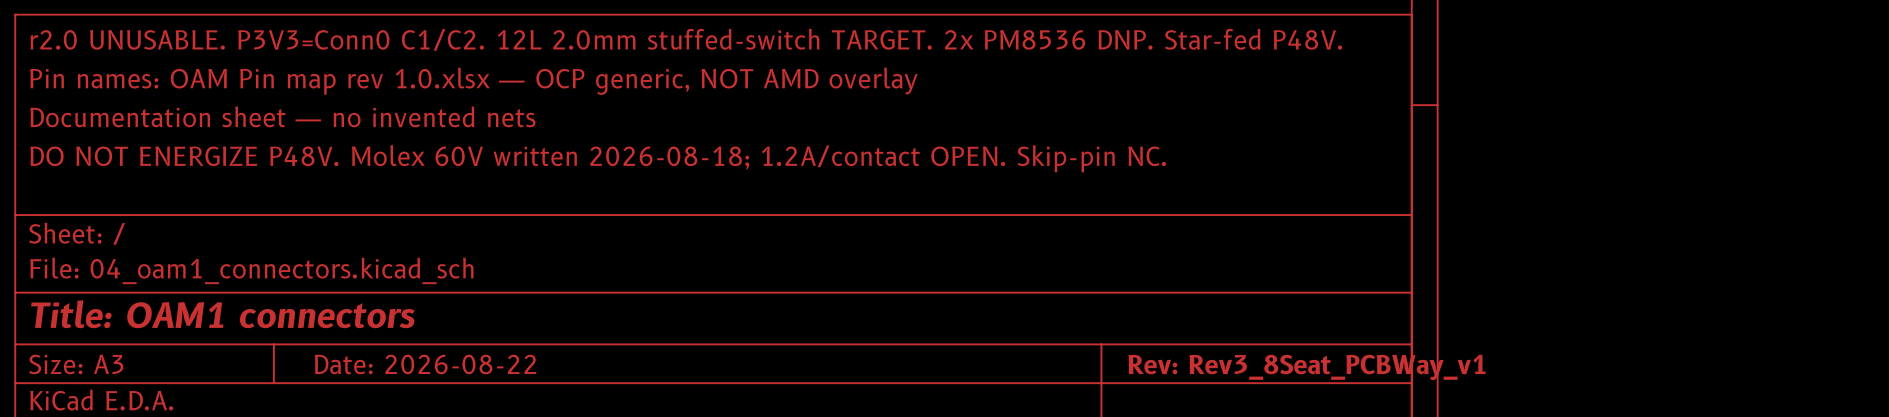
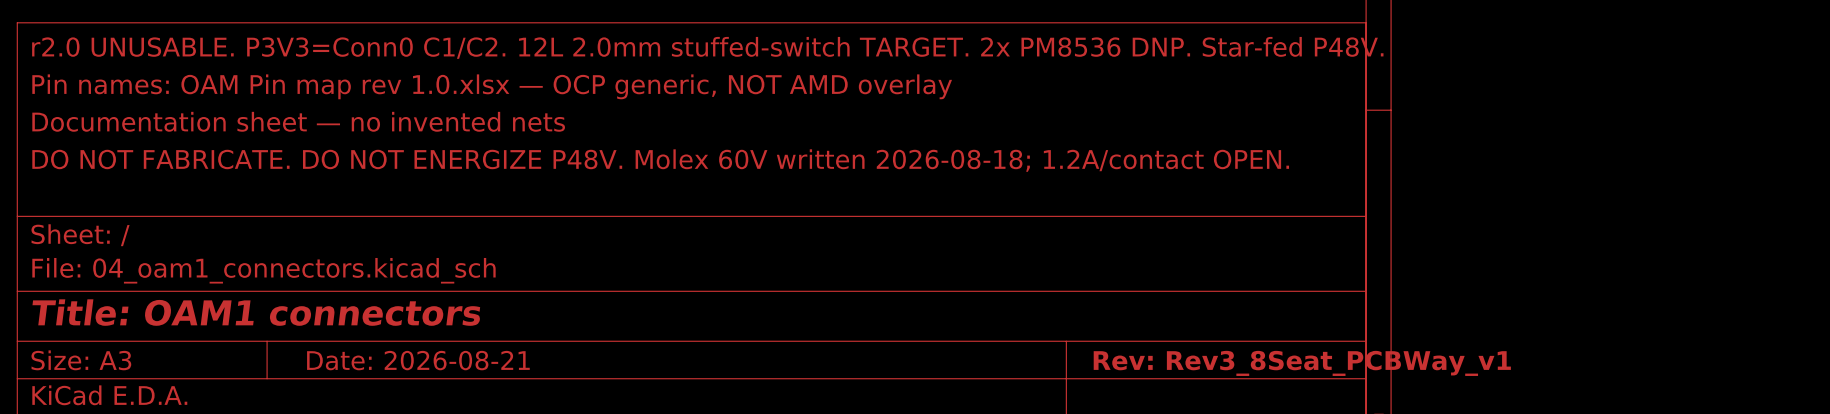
title block: DO NOT ENERGIZE P48V. Molex 60V written 2026-08-18; 1.2A/contact OPEN. Skip-pin NC. (598, 158) -> DO NOT FABRICATE. DO NOT ENERGIZE P48V. Molex 60V written 2026-08-18; 1.2A/contact OPEN. (660, 160)
title block: Date: 2026-08-22 (425, 364) -> Date: 2026-08-21 (418, 360)

